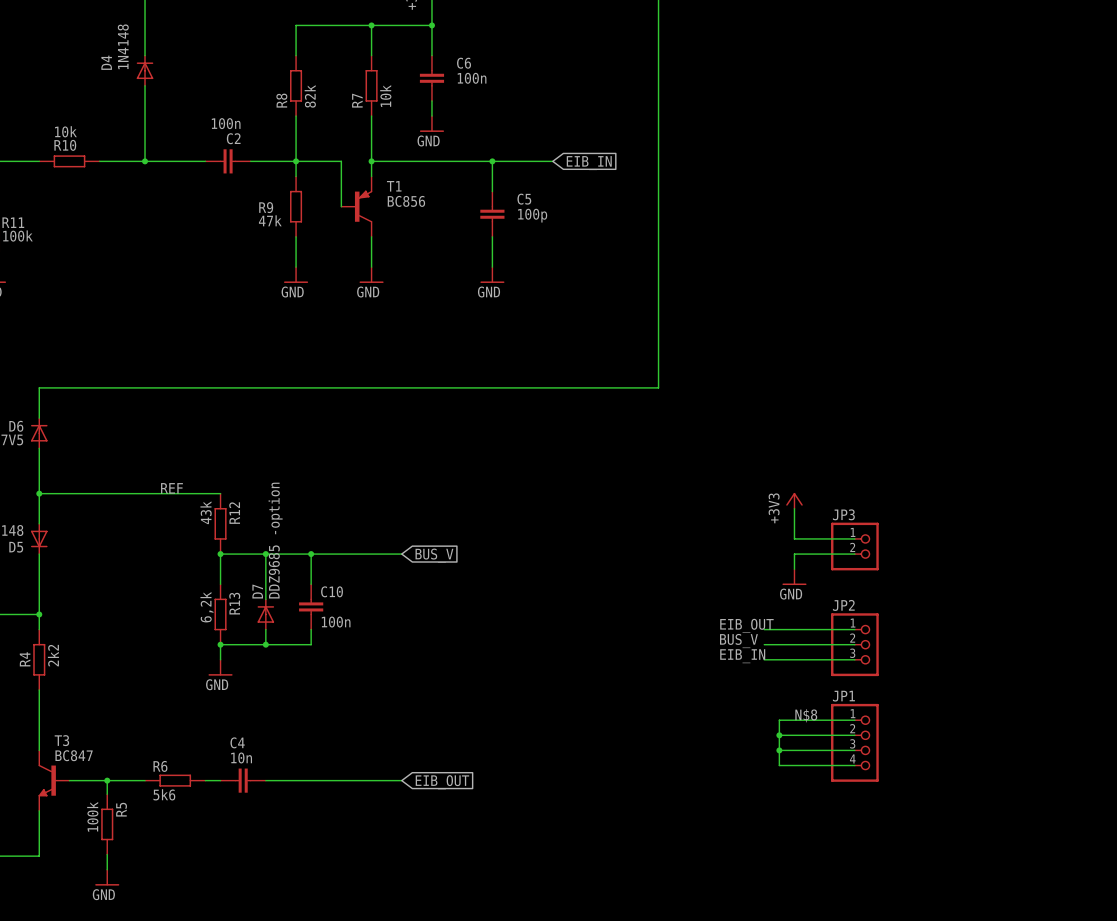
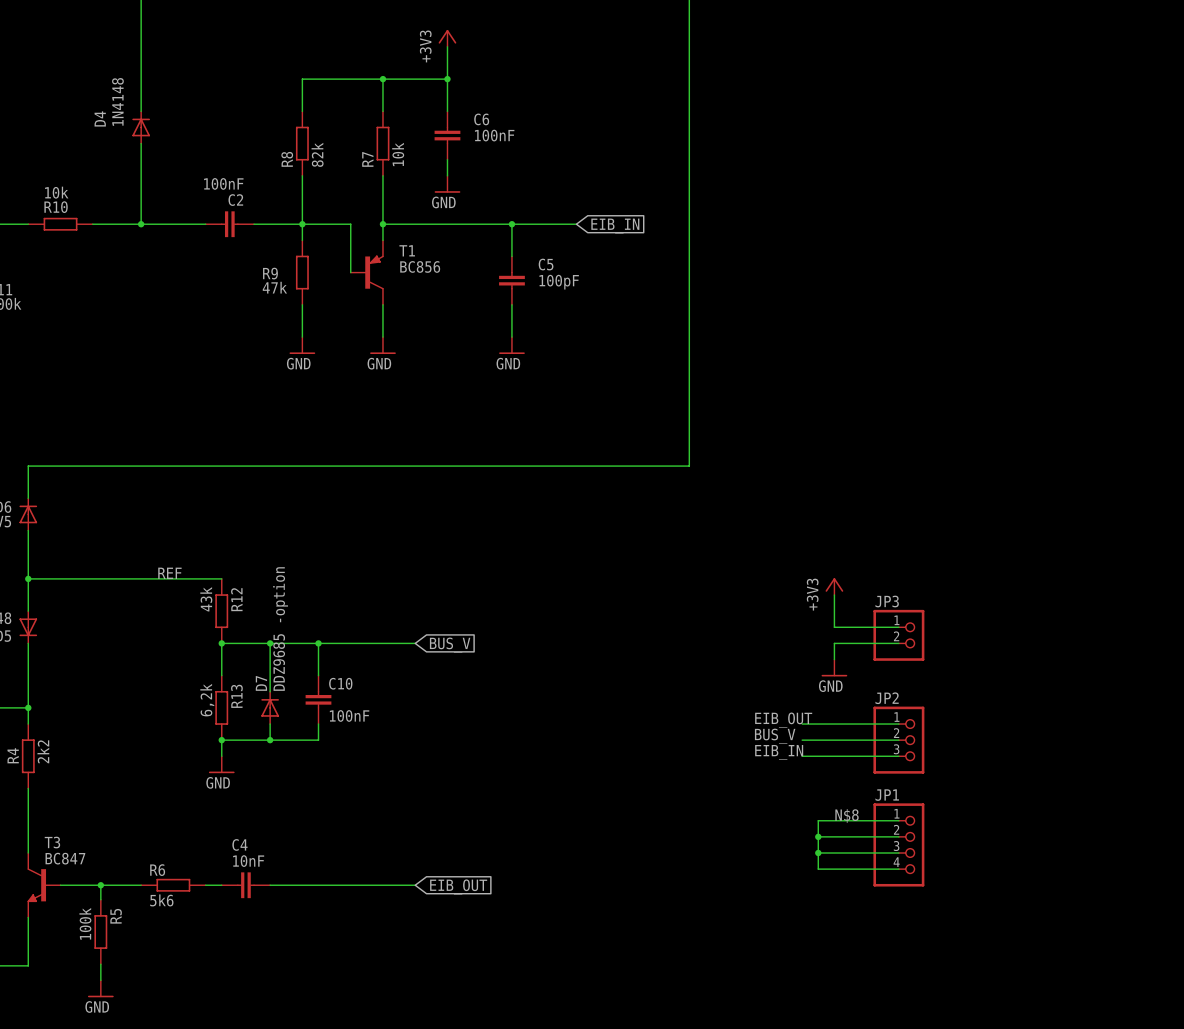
C6 value: 100n (472, 78) -> 100nF (494, 135)
C2 value: 100n (226, 123) -> 100nF (223, 183)
C5 value: 100p (532, 215) -> 100pF (559, 282)
C10 value: 100n (336, 622) -> 100nF (349, 715)
C4 value: 10n (241, 757) -> 10nF (248, 861)

